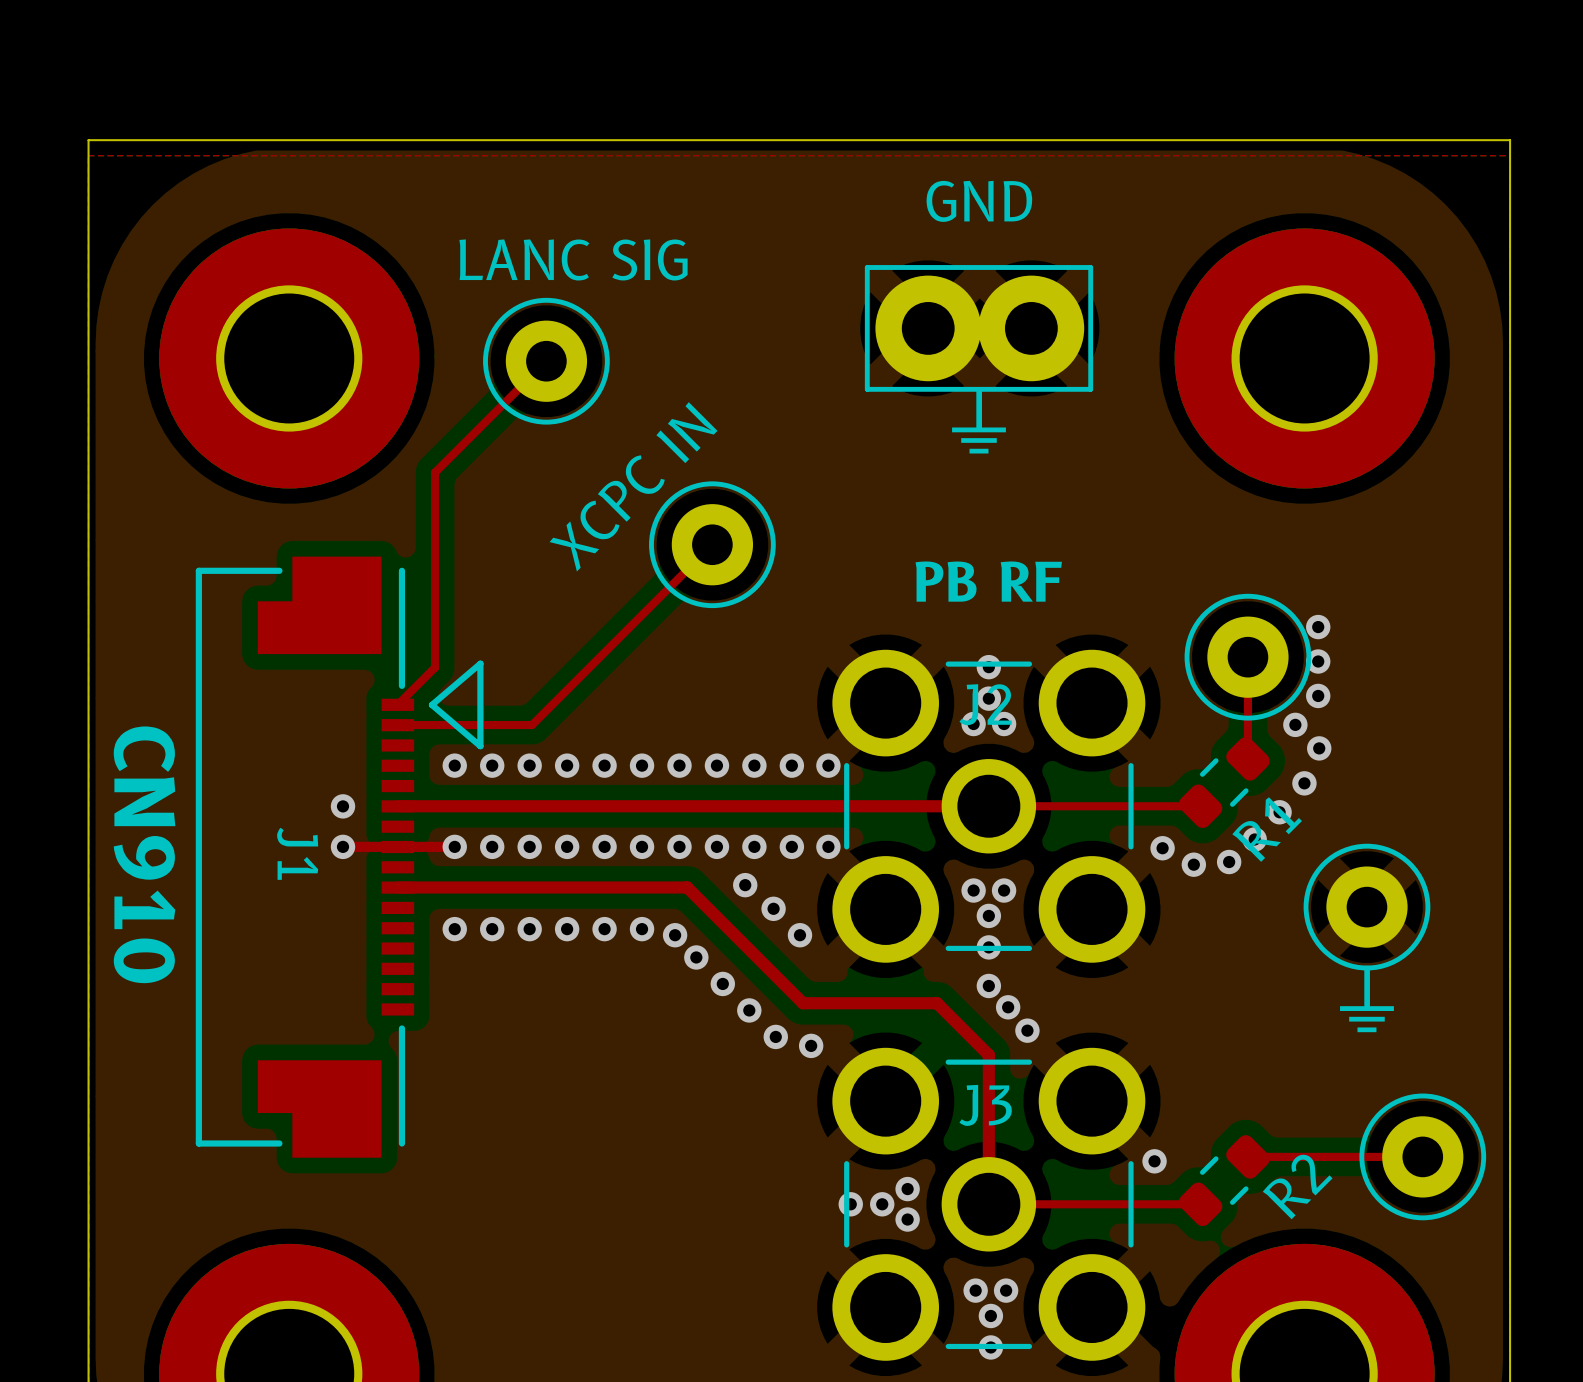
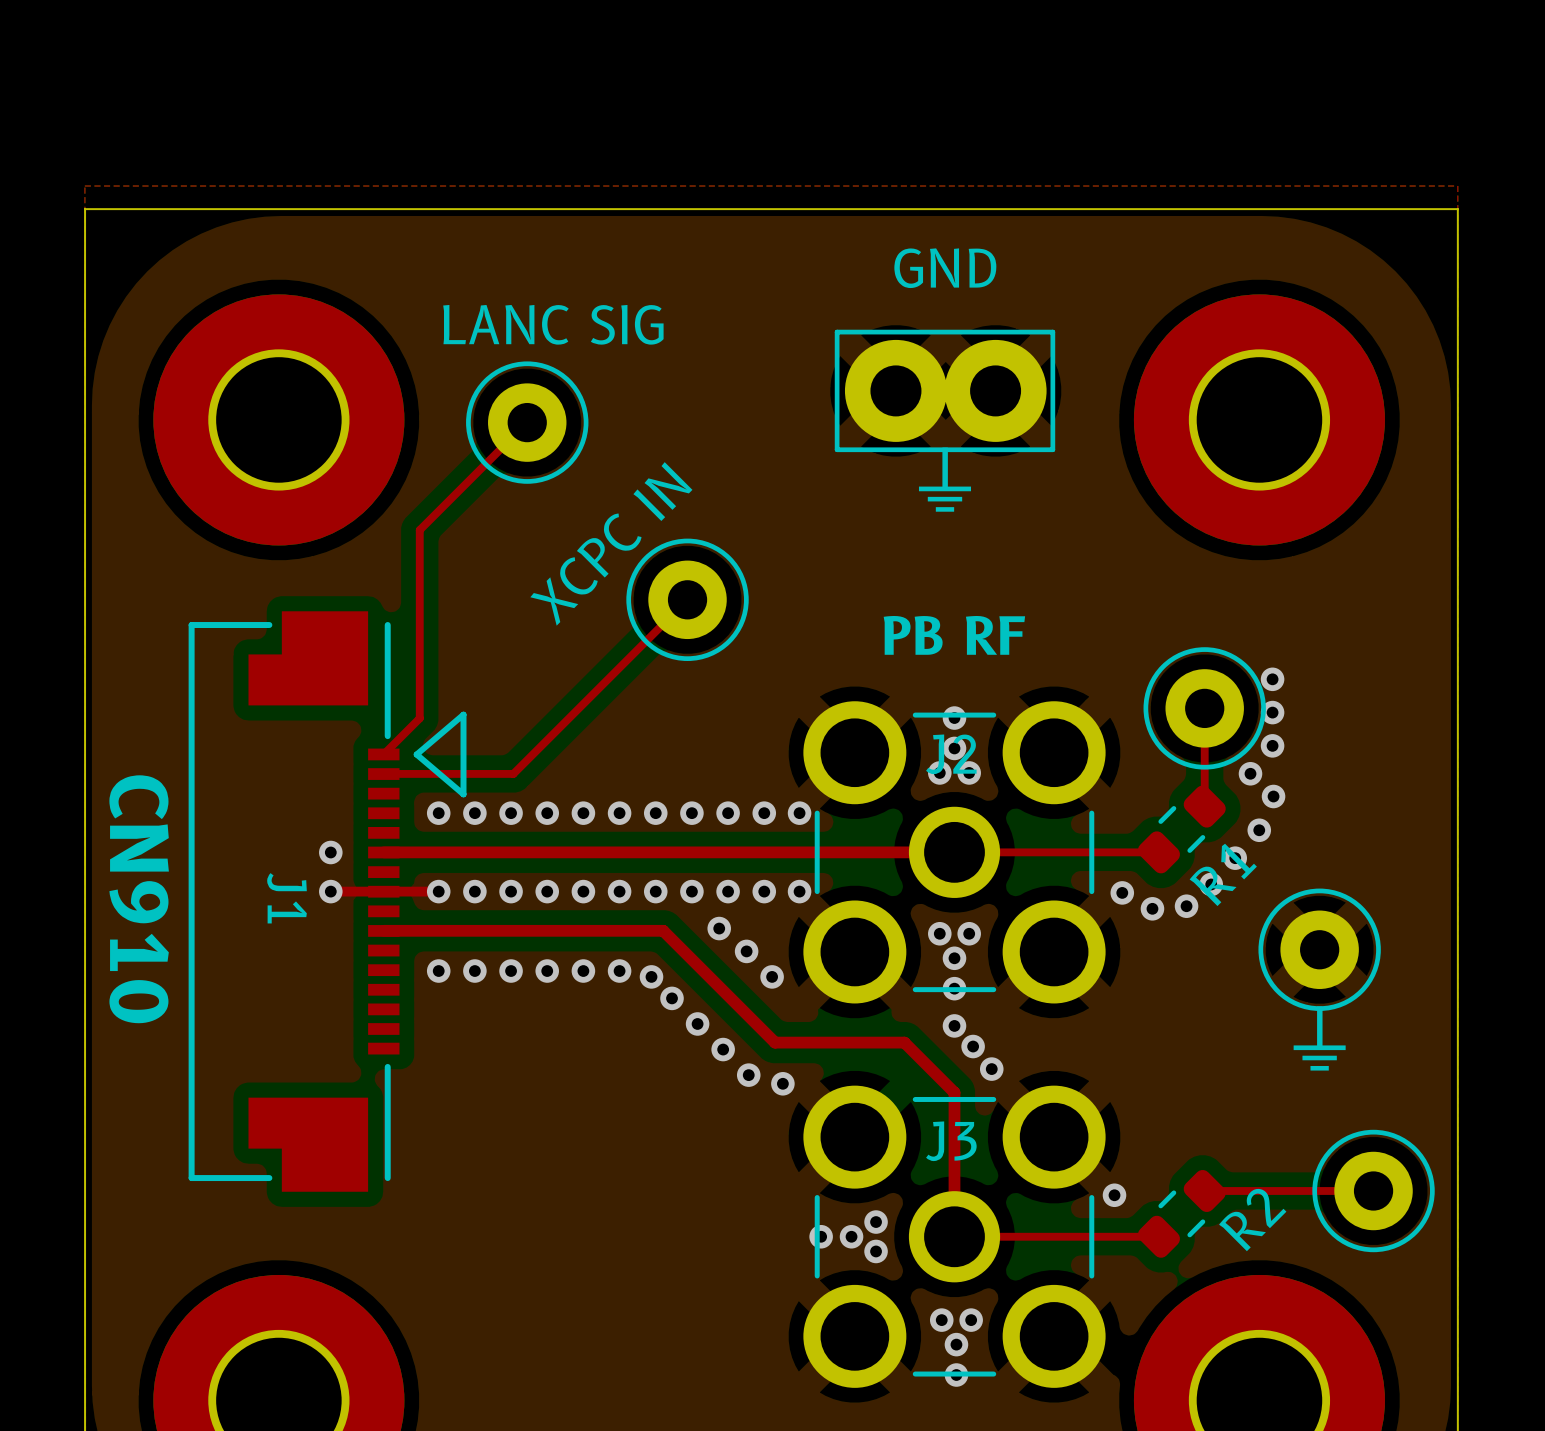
top zone outline: (88, 155) (1509, 155) -> (84, 224) (84, 186) (1457, 186) (1457, 224)

